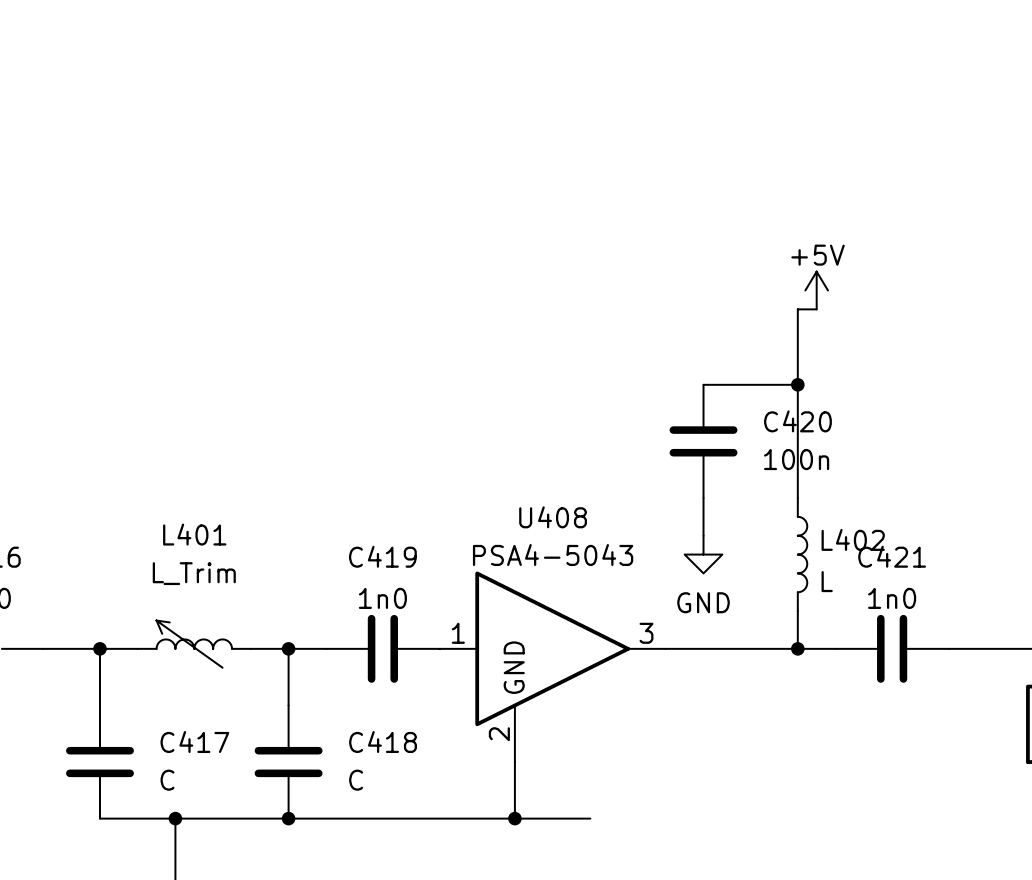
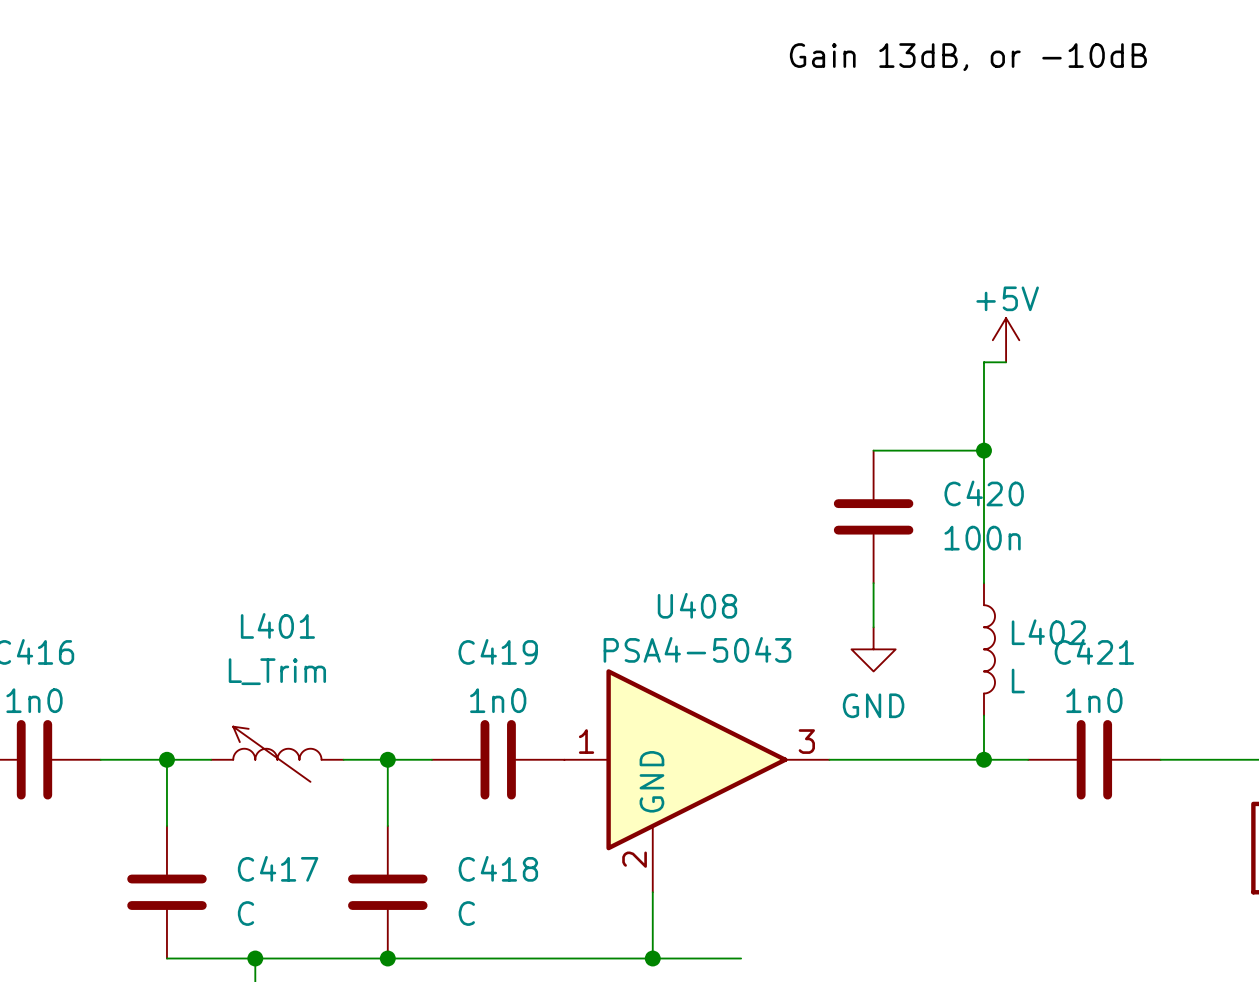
label: none -> Gain 13dB, or -10dB (968, 57)

